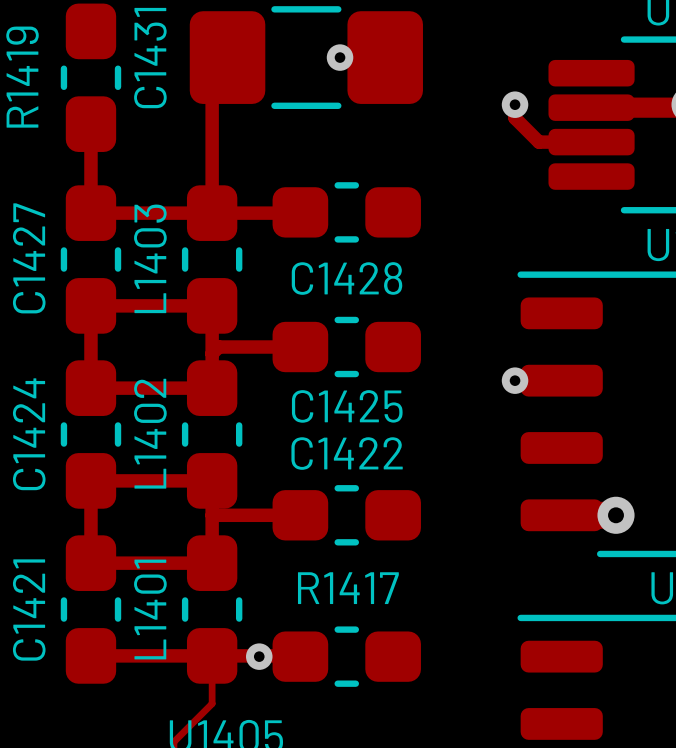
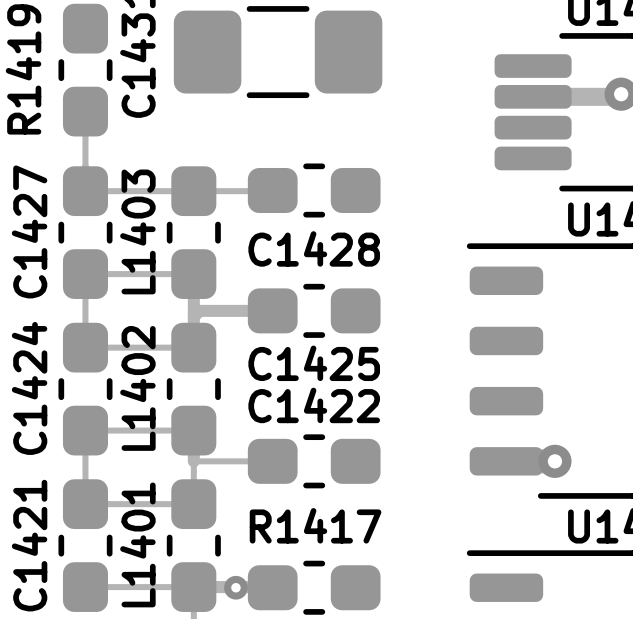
track: (227, 57) (212, 72) (212, 213) -> none
via: (340, 57) -> none
track: (515, 104) (515, 118) (538, 142) (591, 142) -> none
via: (515, 104) -> none
track width: thick (90, 124) (90, 213) (299, 213) -> thin (85, 111) (85, 191) (272, 191)
track width: thick (212, 305) (90, 305) (90, 388) (212, 388) -> thin (193, 274) (85, 274) (85, 347) (193, 347)
via: (515, 380) -> none
track width: thick (212, 480) (90, 480) (90, 563) (212, 563) (212, 515) (300, 515) -> thin (193, 430) (85, 430) (85, 504) (193, 504) (193, 461) (272, 461)
track width: thick (90, 655) (212, 655) -> thin (85, 587) (193, 587)

